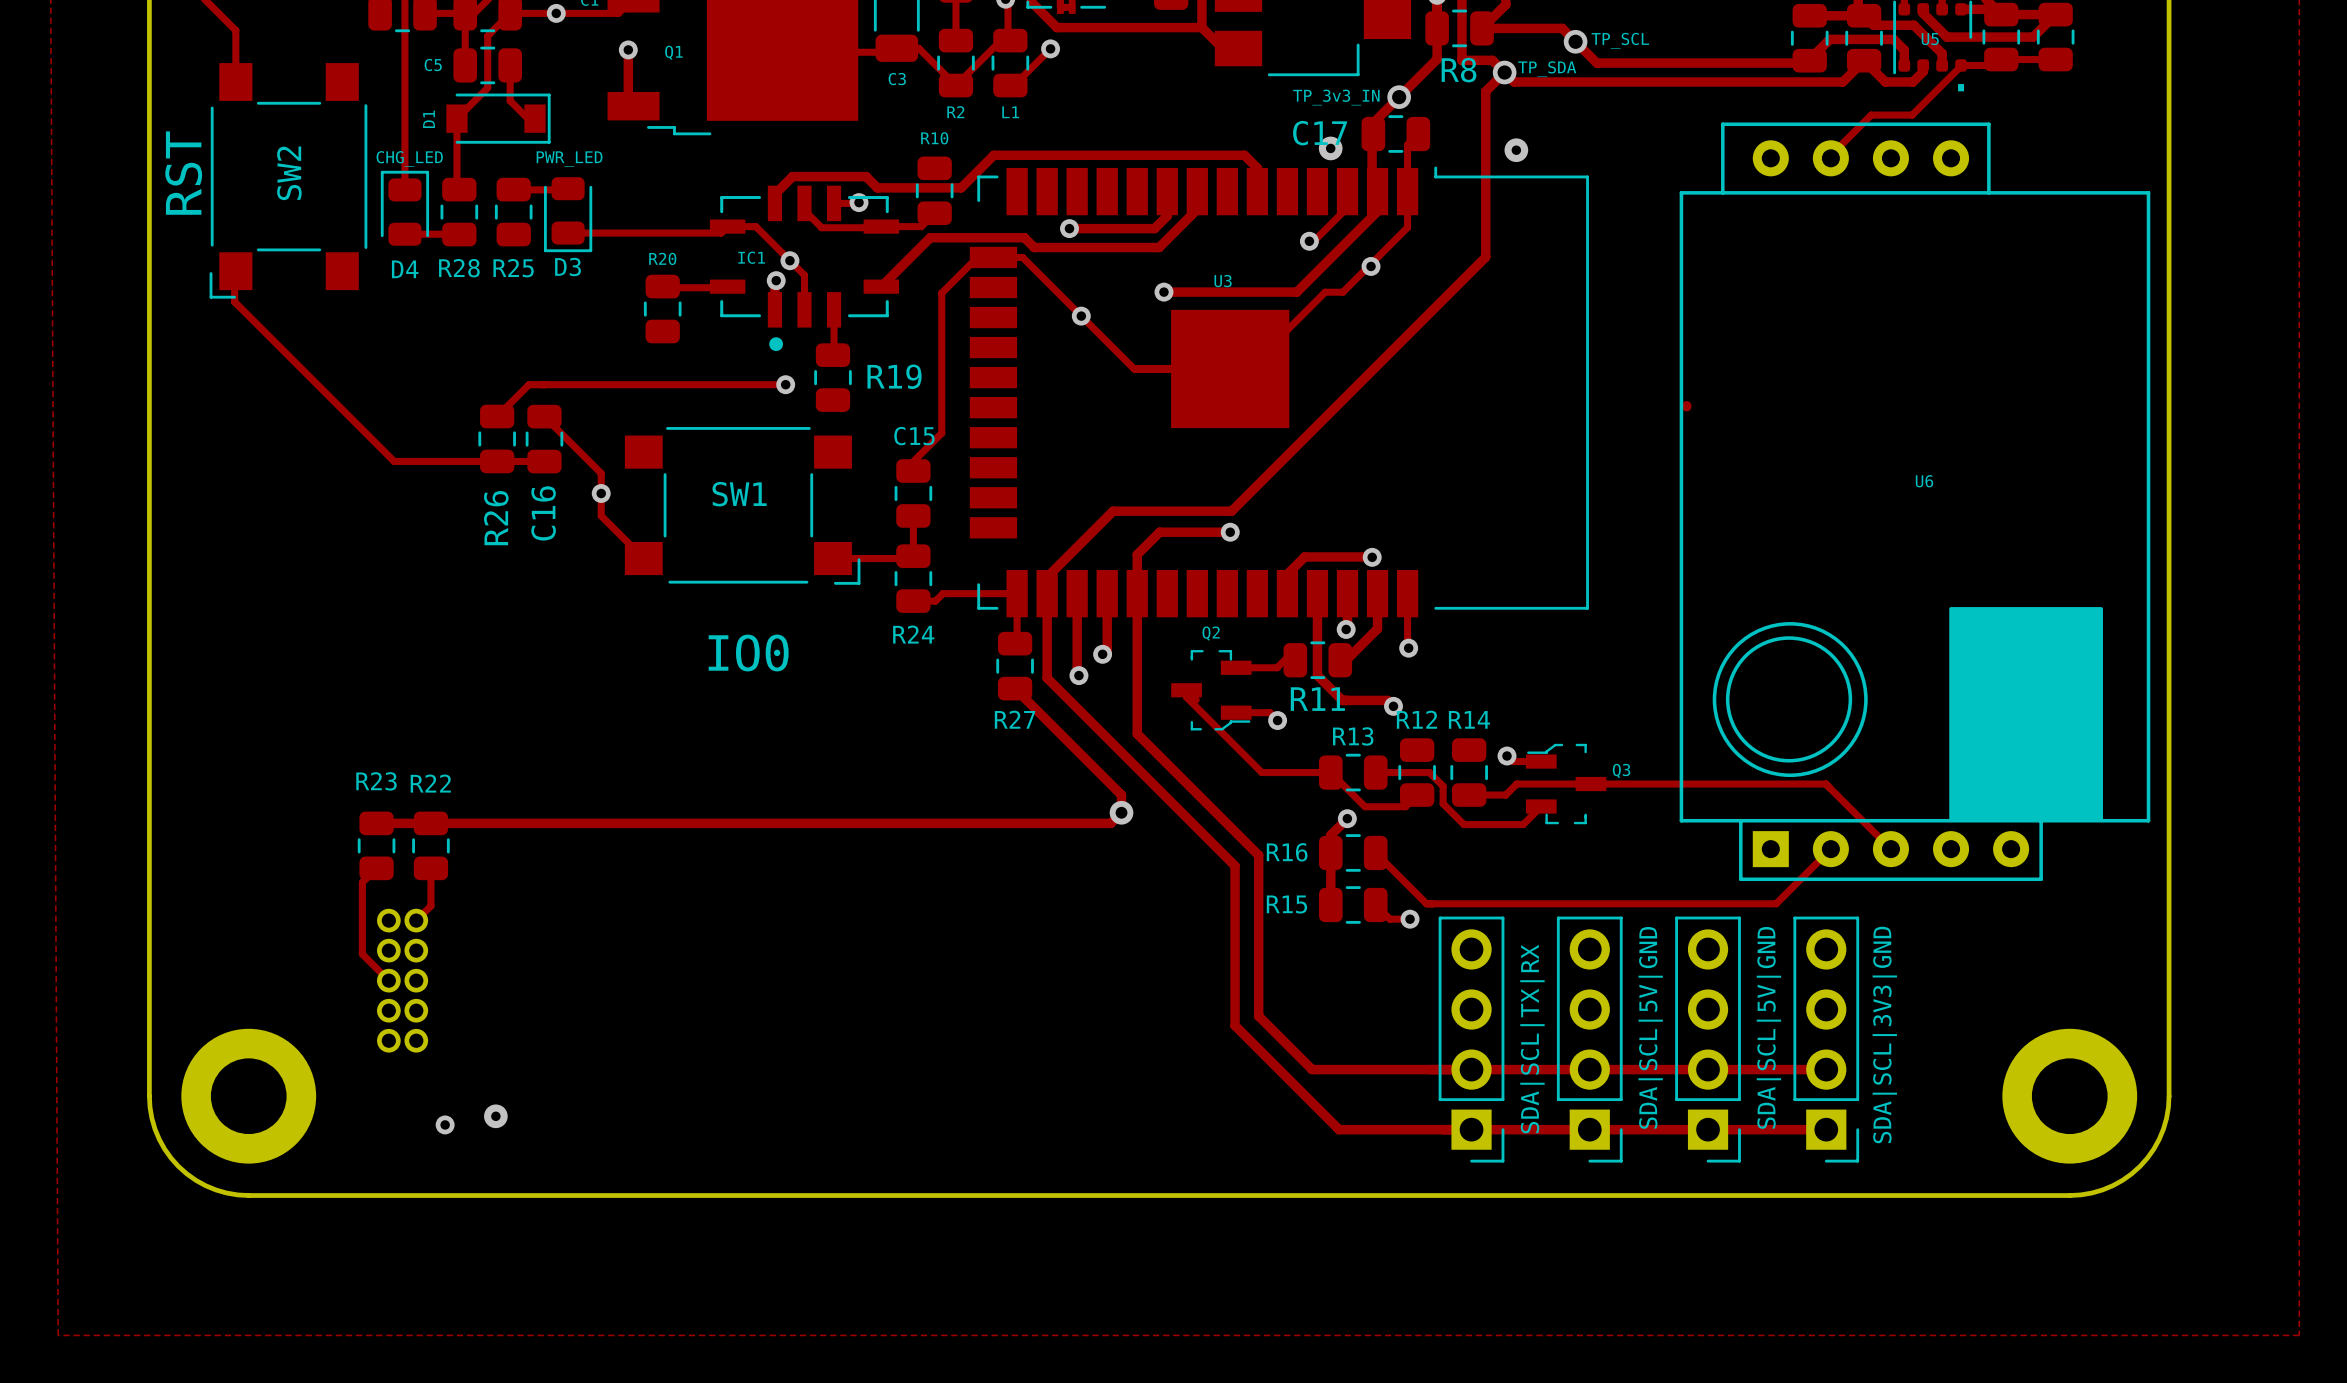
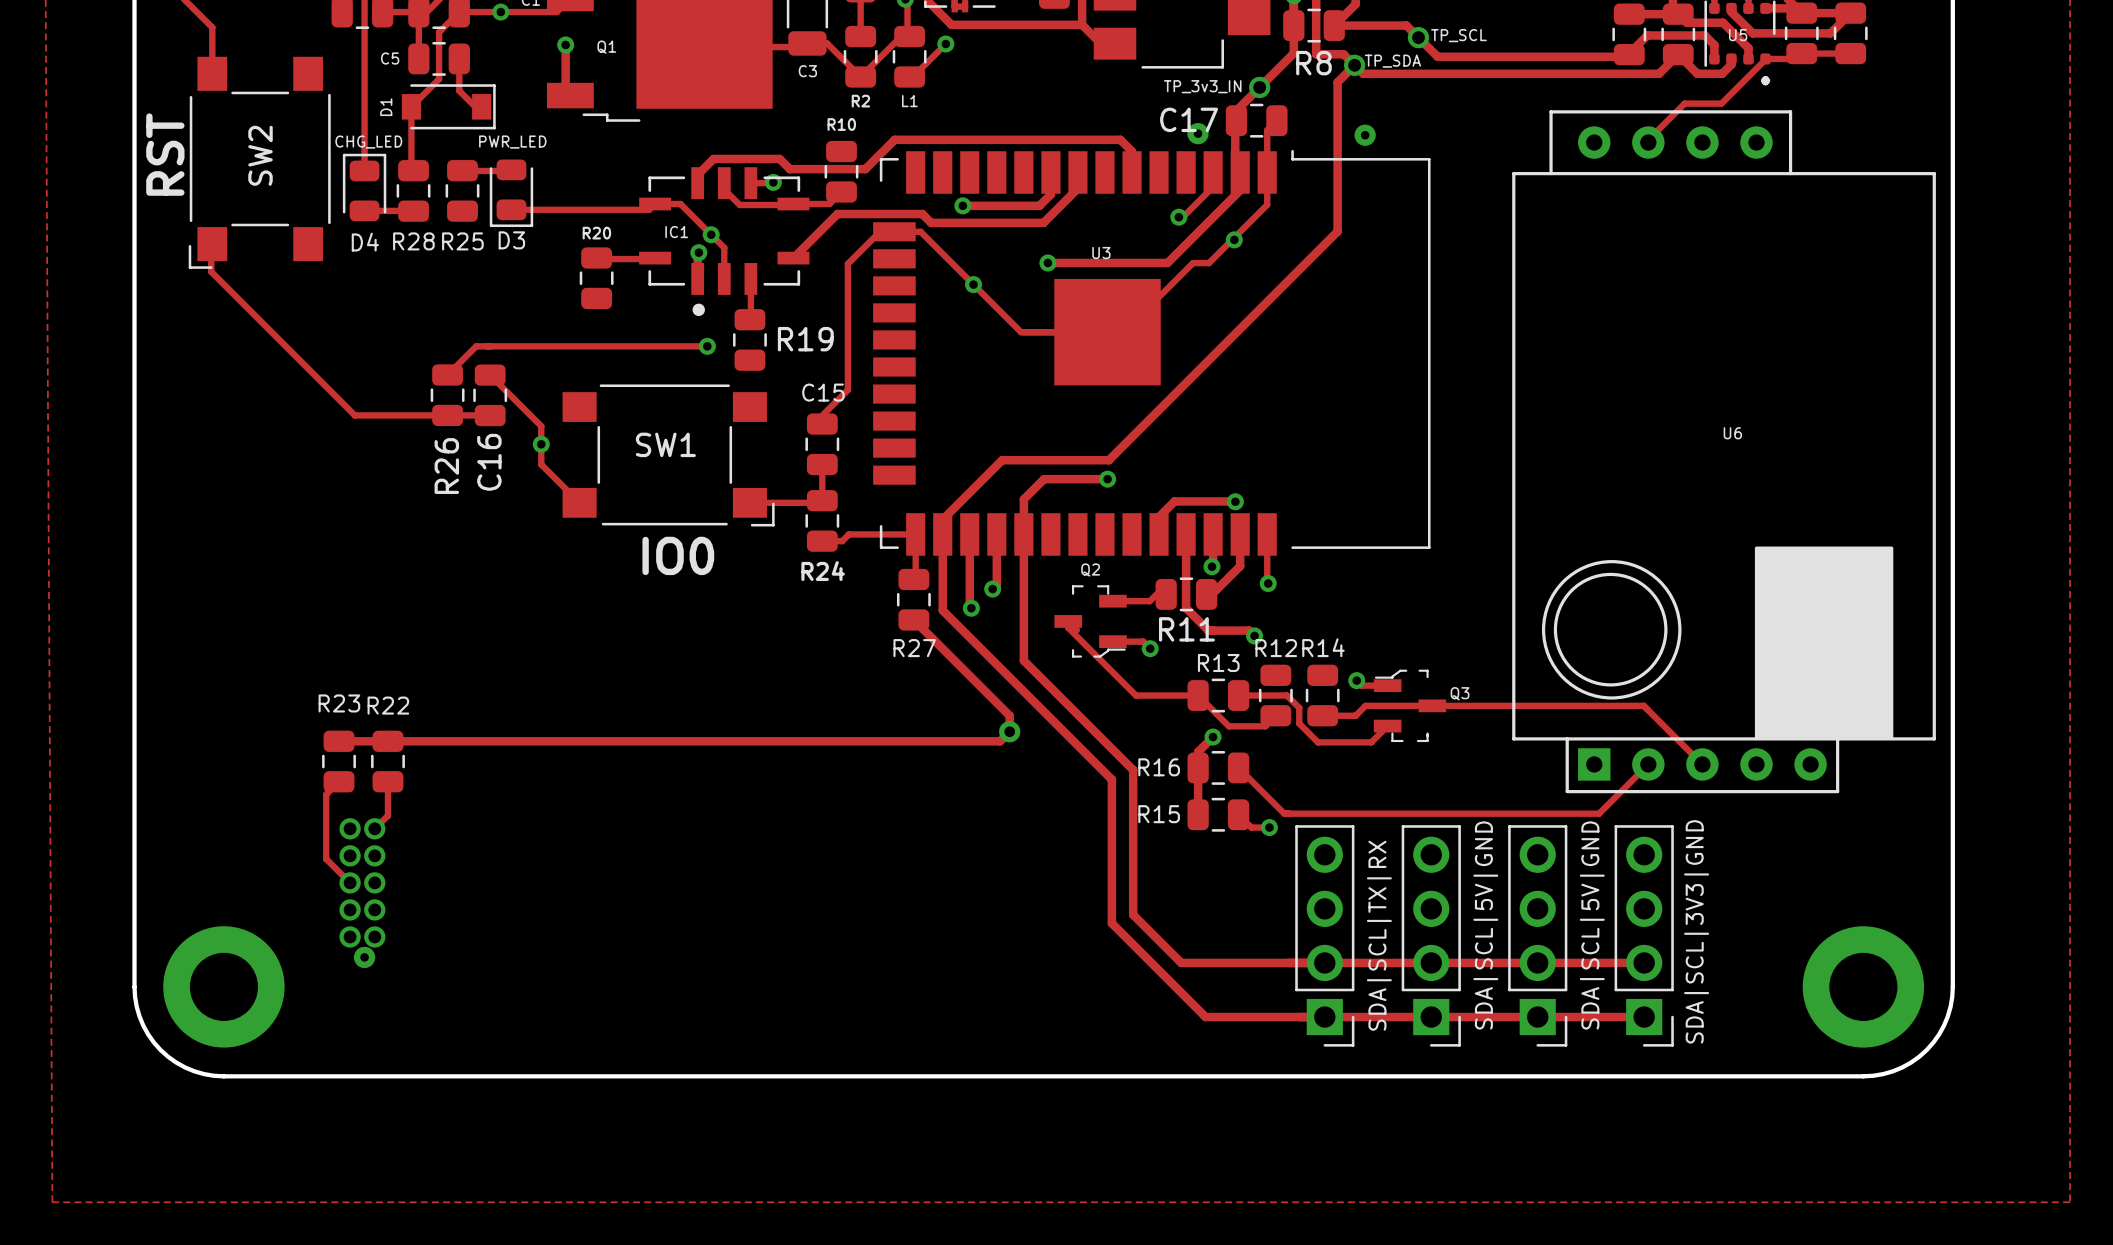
track: (1686, 405) (1686, 406) -> none
text position: IO0 (748, 653) -> IO0 (678, 555)
via position: (495, 1116) -> (364, 957)
via: (445, 1124) -> none

